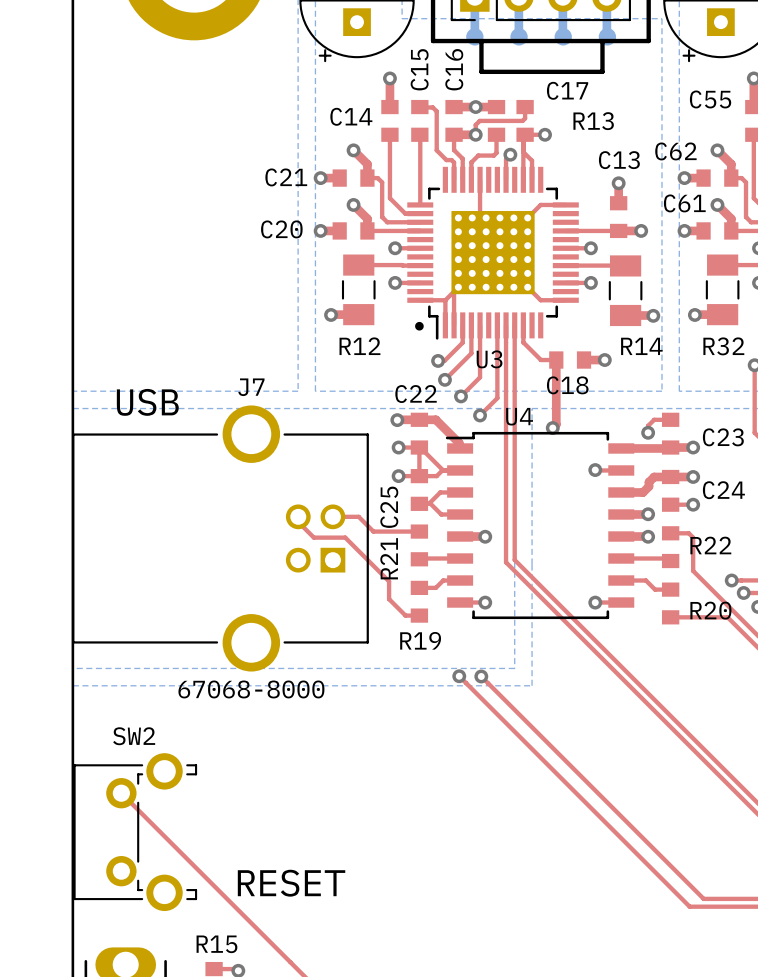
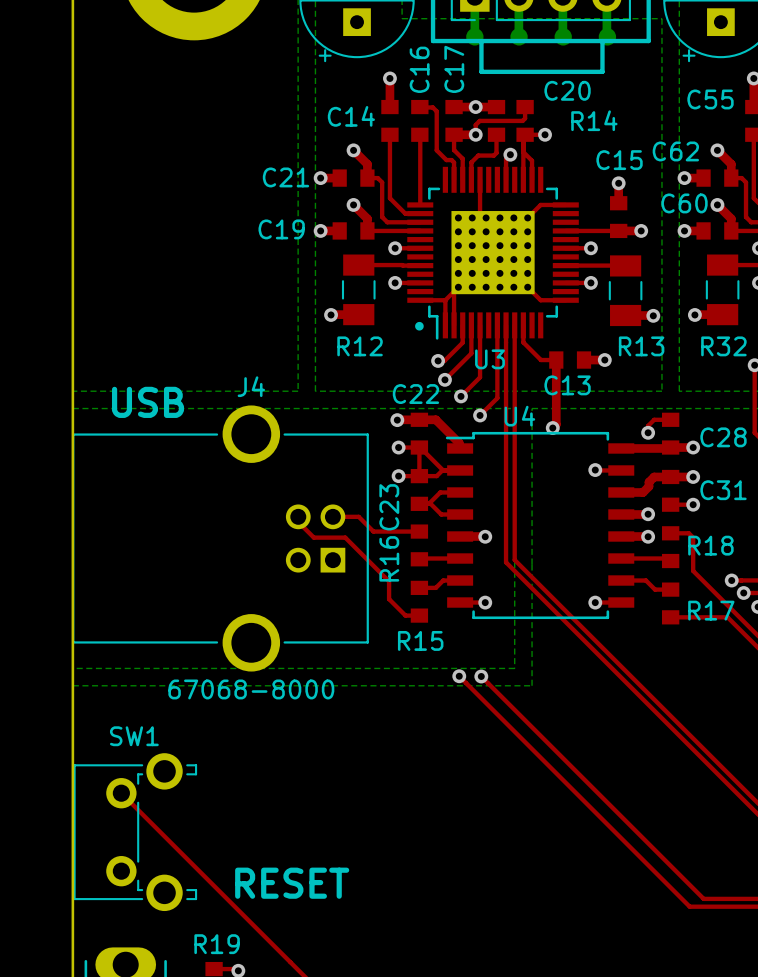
C15 name: C15 (419, 69) -> C16 (419, 69)
C16 name: C16 (454, 69) -> C17 (454, 69)
C17 name: C17 (567, 90) -> C20 (567, 90)
R13 name: R13 (593, 121) -> R14 (594, 120)
C13 name: C13 (619, 160) -> C15 (619, 160)
C61 name: C61 (684, 203) -> C60 (684, 203)
C20 name: C20 (281, 229) -> C19 (281, 229)
R14 name: R14 (641, 346) -> R13 (641, 346)
C18 name: C18 (567, 385) -> C13 (567, 385)
J7 name: J7 (251, 387) -> J4 (251, 386)
C23 name: C23 (723, 437) -> C28 (723, 437)
C24 name: C24 (723, 490) -> C31 (723, 490)
C25 name: C25 (389, 507) -> C23 (389, 507)
R22 name: R22 (710, 545) -> R18 (710, 545)
R21 name: R21 (389, 558) -> R16 (389, 558)
R20 name: R20 (710, 610) -> R17 (711, 610)
R19 name: R19 (420, 640) -> R15 (420, 640)
SW2 name: SW2 (134, 736) -> SW1 (134, 736)
R15 name: R15 (216, 944) -> R19 (217, 944)

